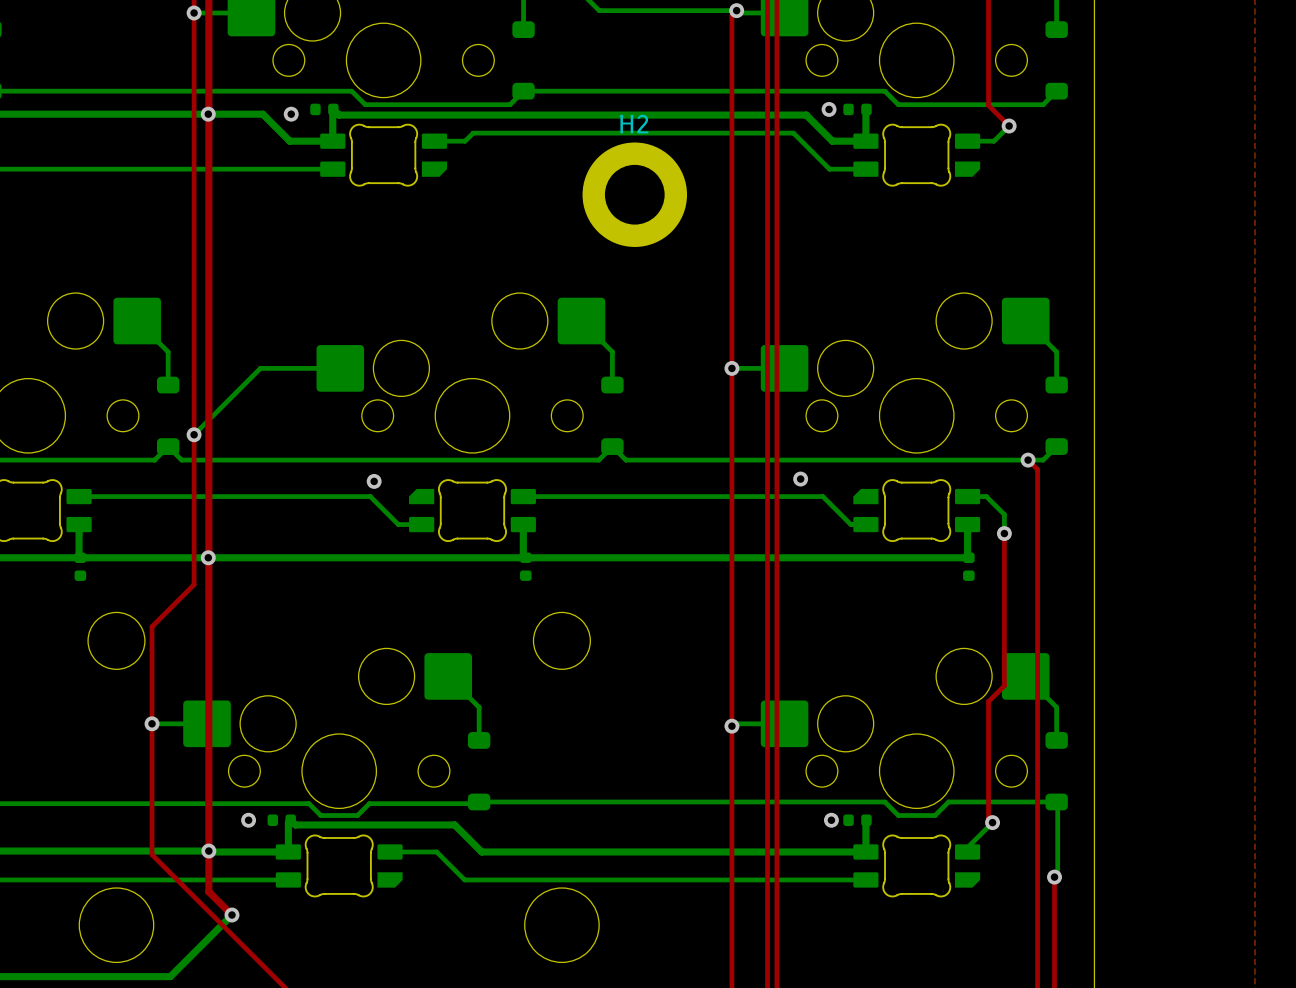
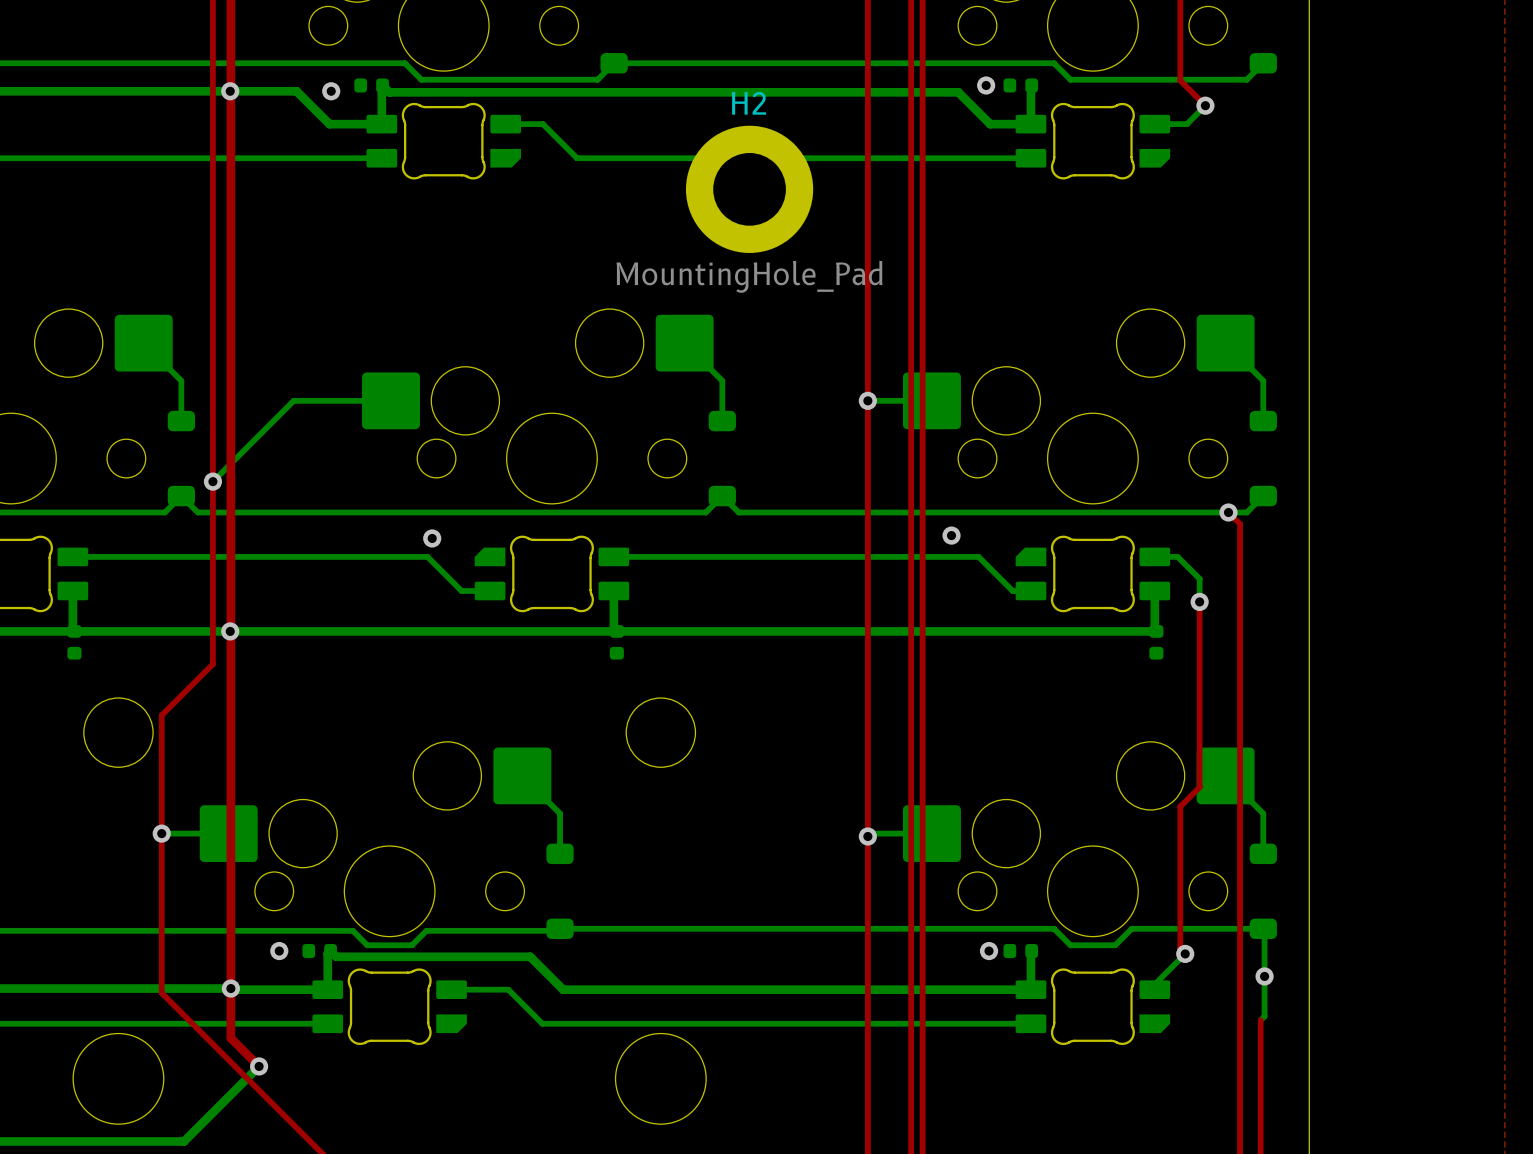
bottom track: (465, 141) (473, 133) (793, 133) (829, 169) -> (542, 124) (577, 158) (986, 158)
H2 value: none -> MountingHole_Pad (749, 276)
via position: (1054, 877) -> (1264, 976)

